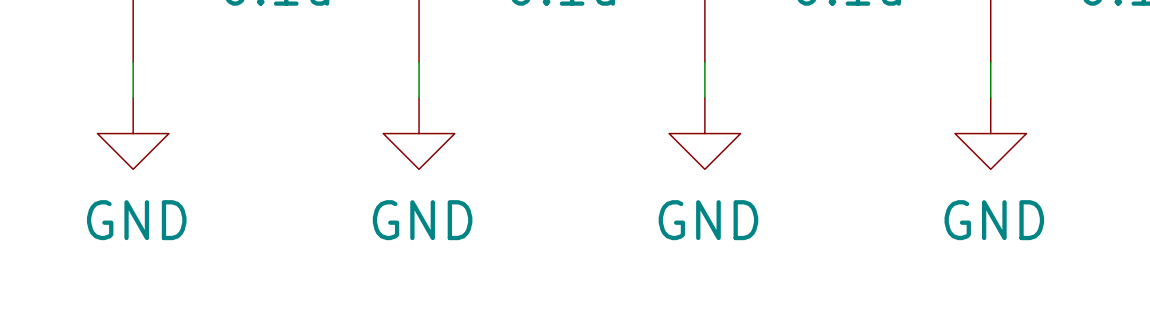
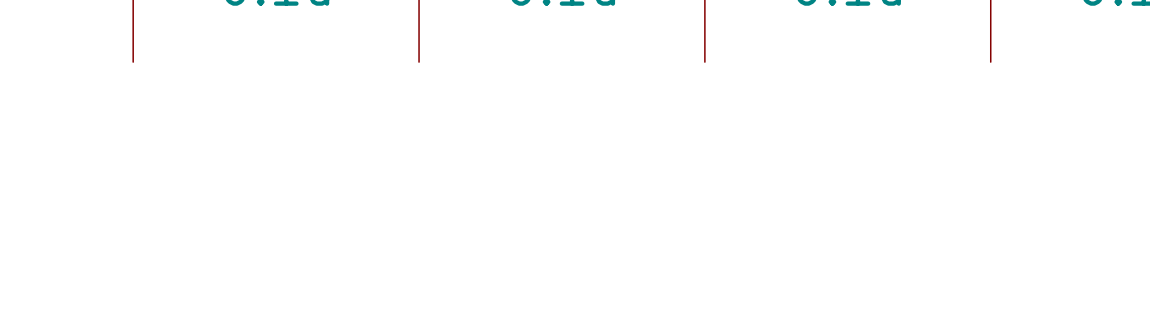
wire: (133, 62) (133, 97) -> none
wire: (419, 62) (419, 97) -> none
wire: (704, 62) (704, 97) -> none
wire: (990, 62) (990, 97) -> none
power symbol: GND (133, 133) -> none
power symbol: GND (419, 133) -> none
power symbol: GND (704, 133) -> none
power symbol: GND (990, 133) -> none

